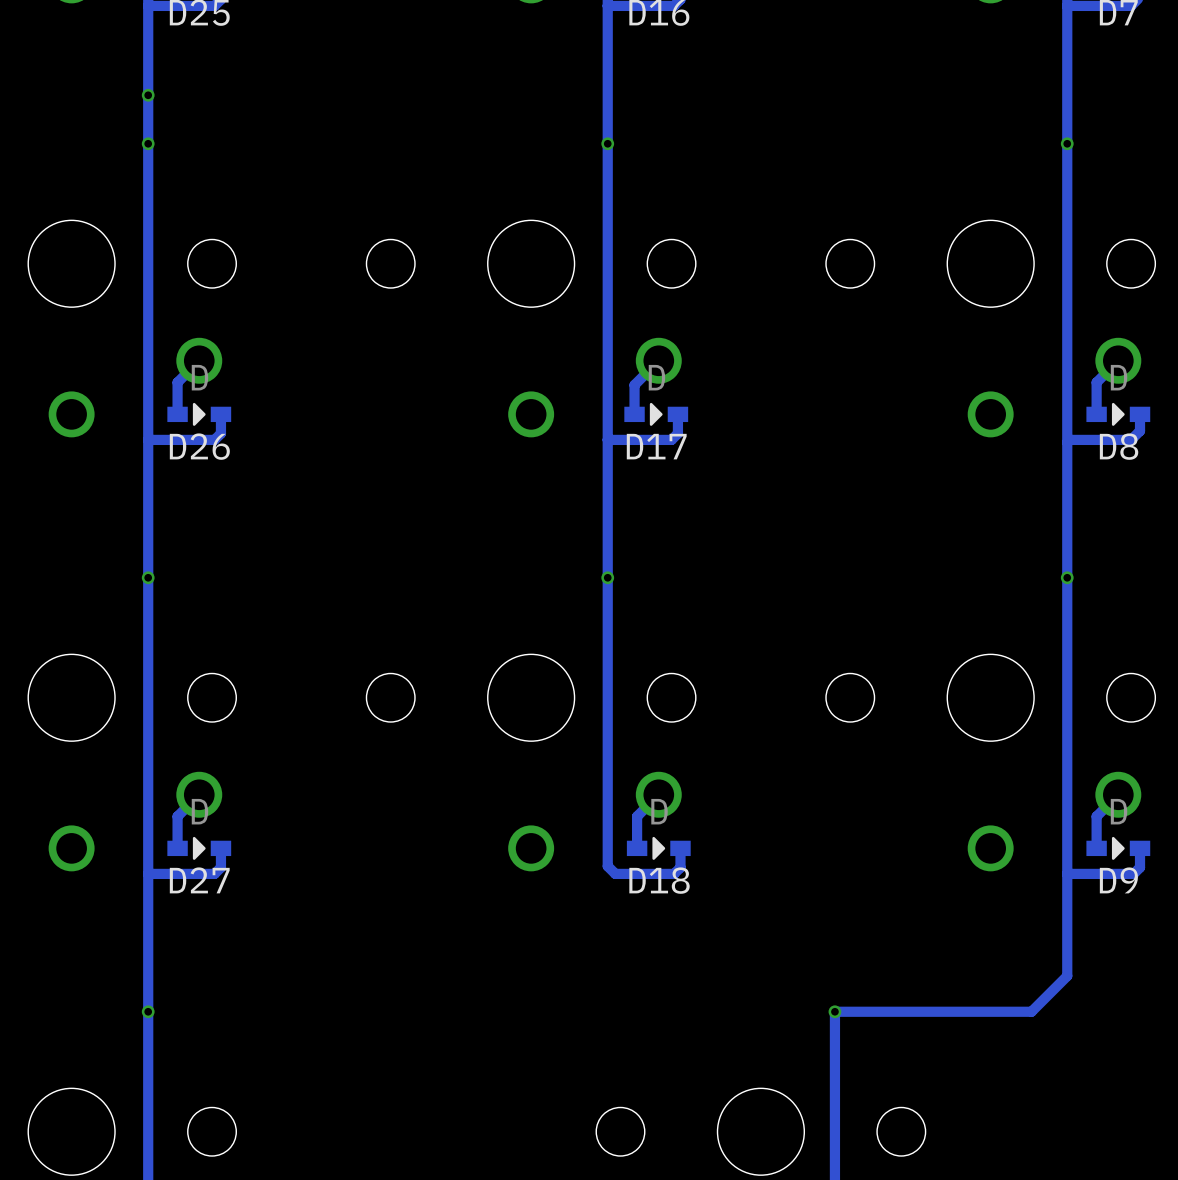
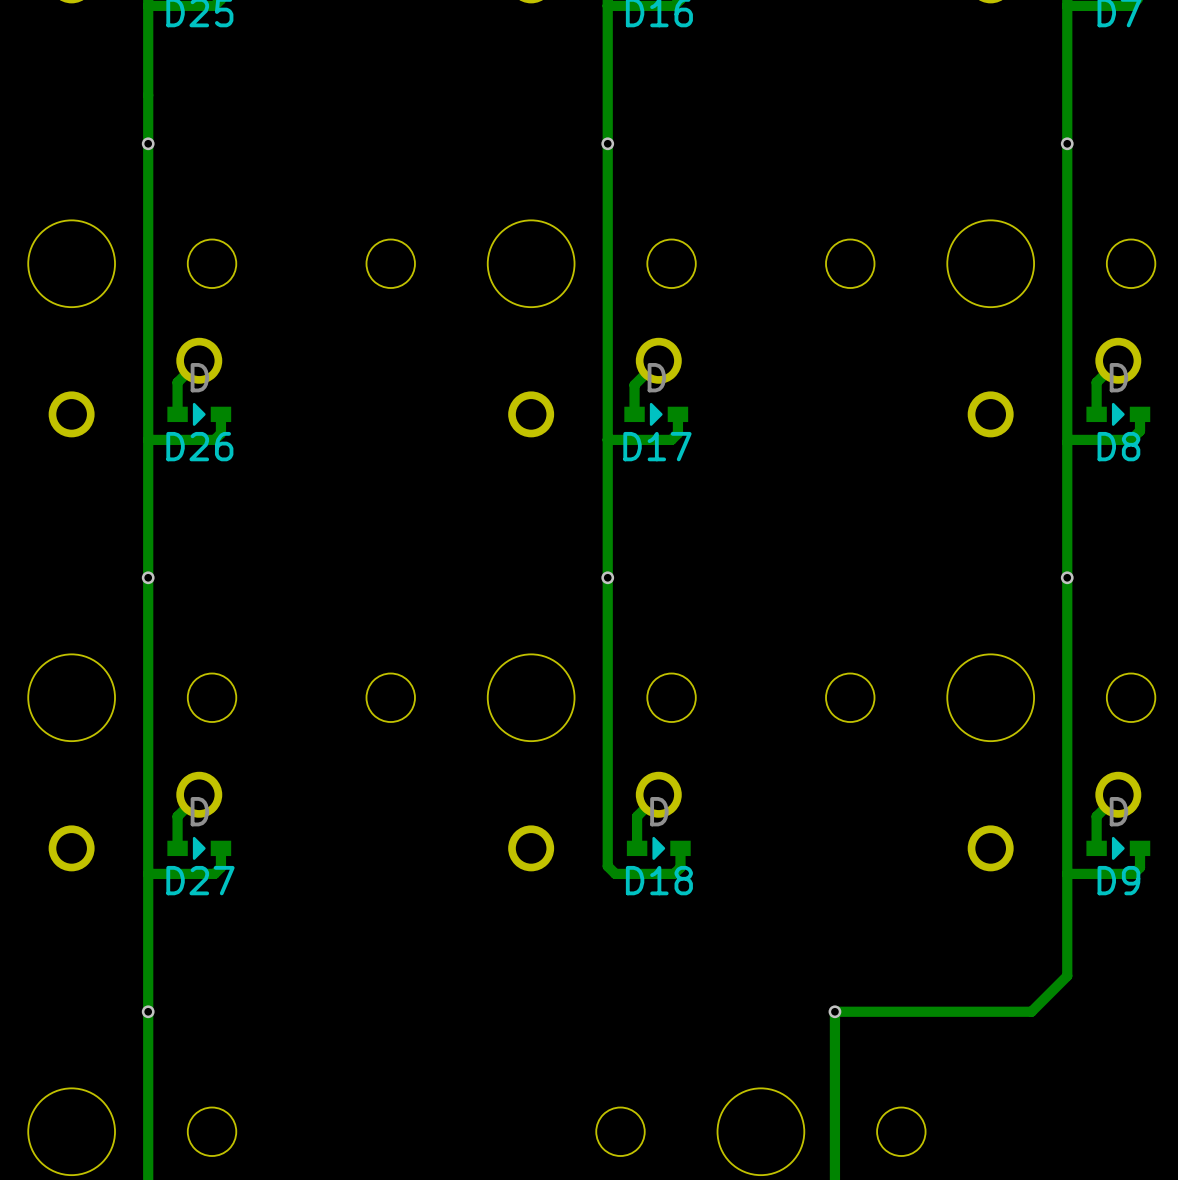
via: (148, 95) -> none

